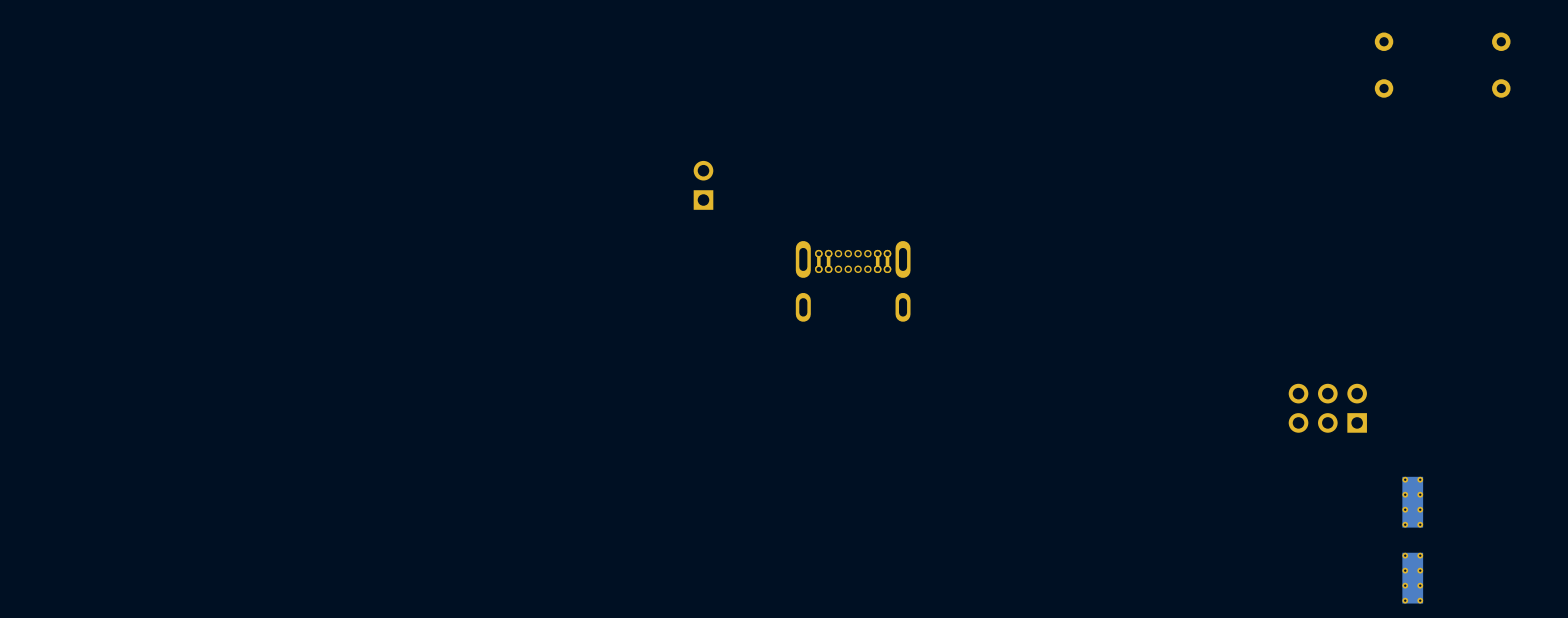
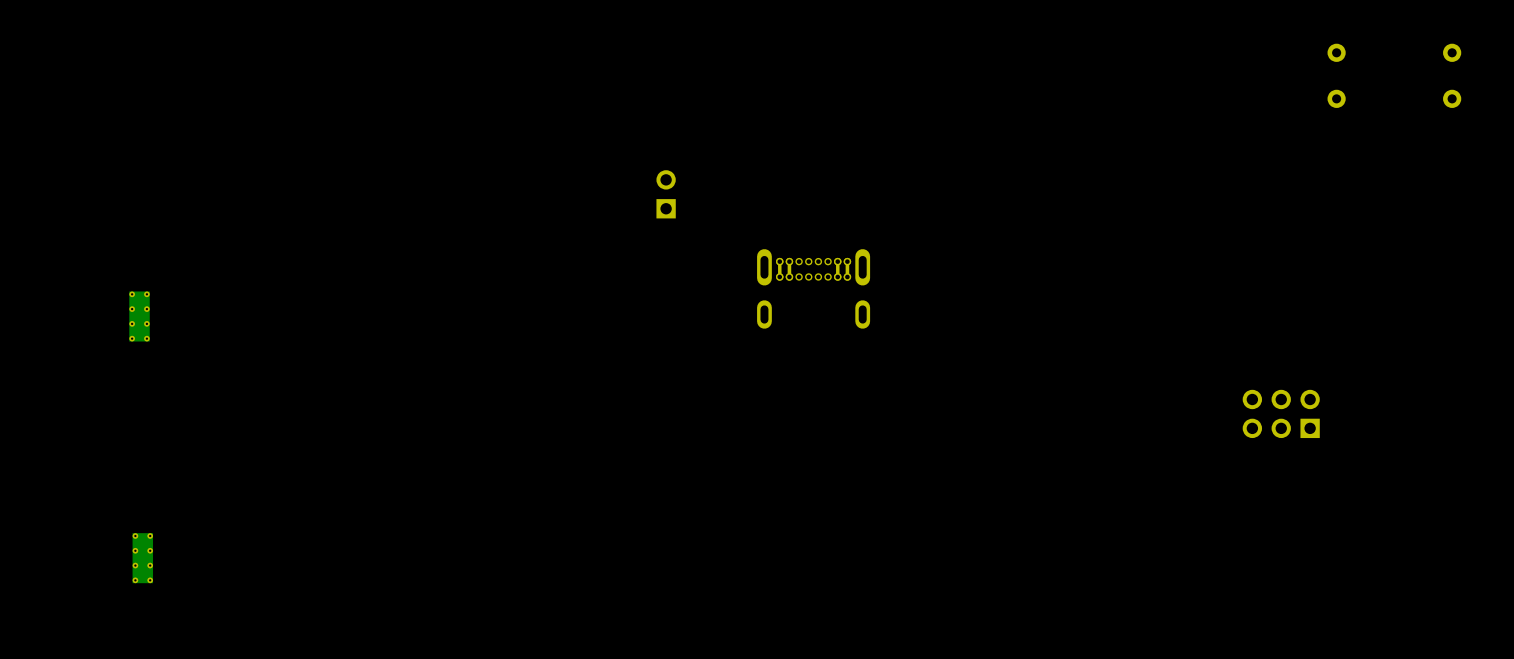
part: none -> (139, 316)
part: (1412, 502) -> none
part: none -> (142, 558)
part: (1412, 578) -> none

